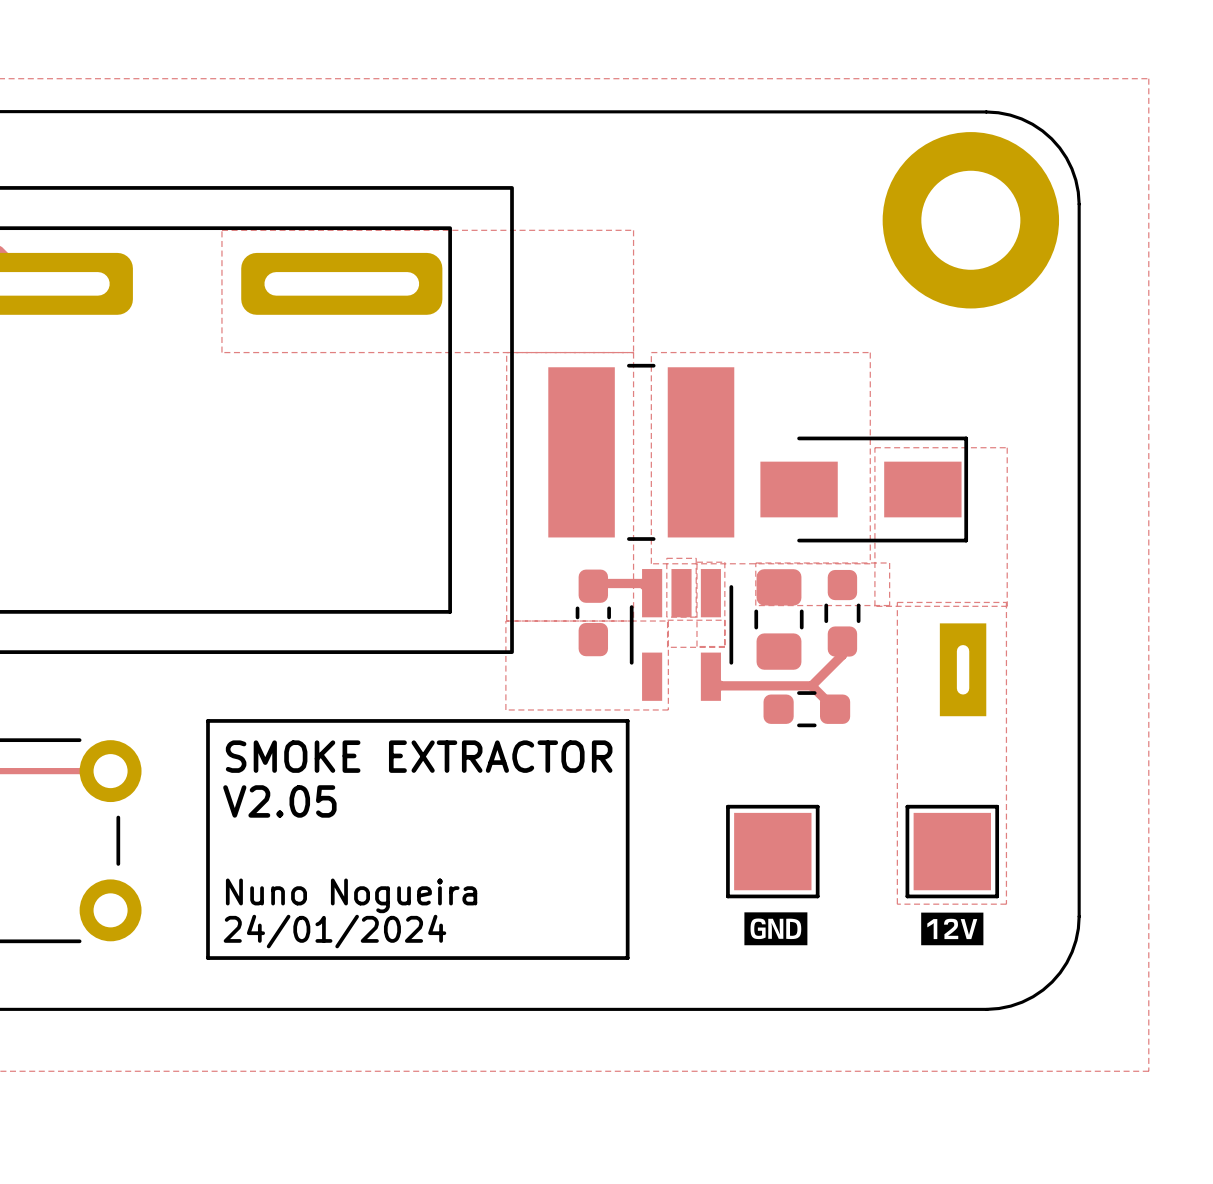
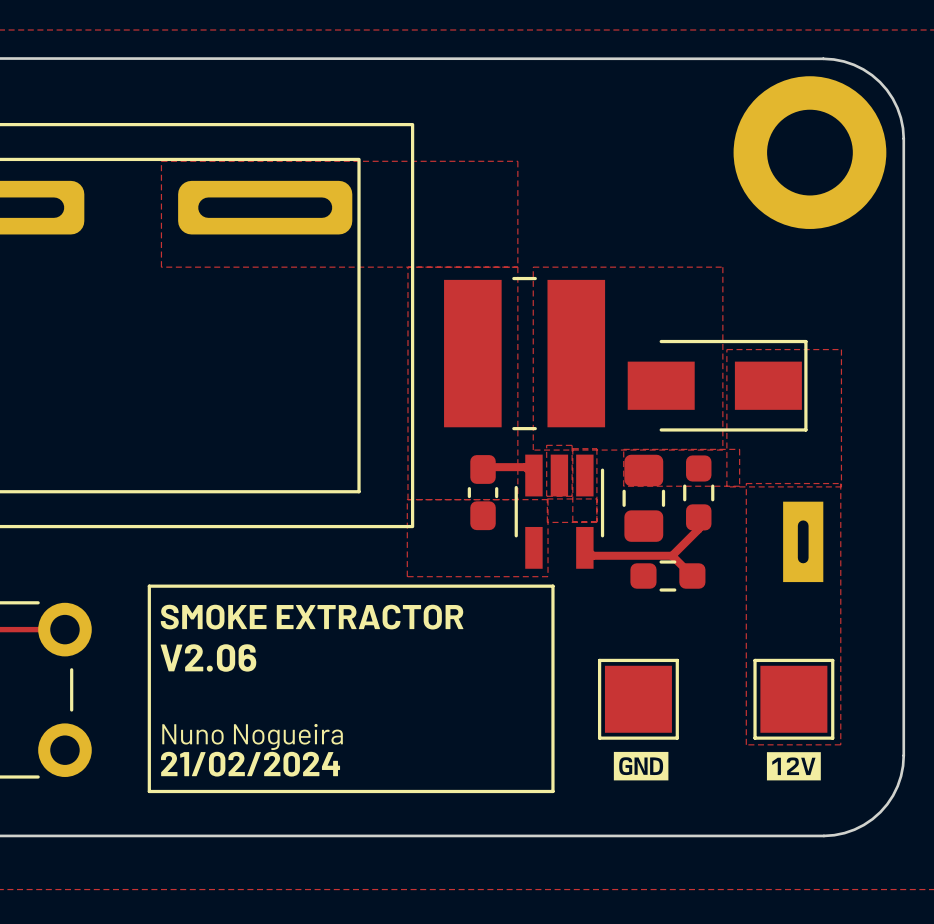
line: (627, 720) (627, 958) -> (512, 586) (552, 586) (552, 791) (512, 791)
text: V2.05 (279, 801) -> V2.06 (208, 658)
text: 24/01/2024 (334, 931) -> 21/02/2024 (250, 764)

